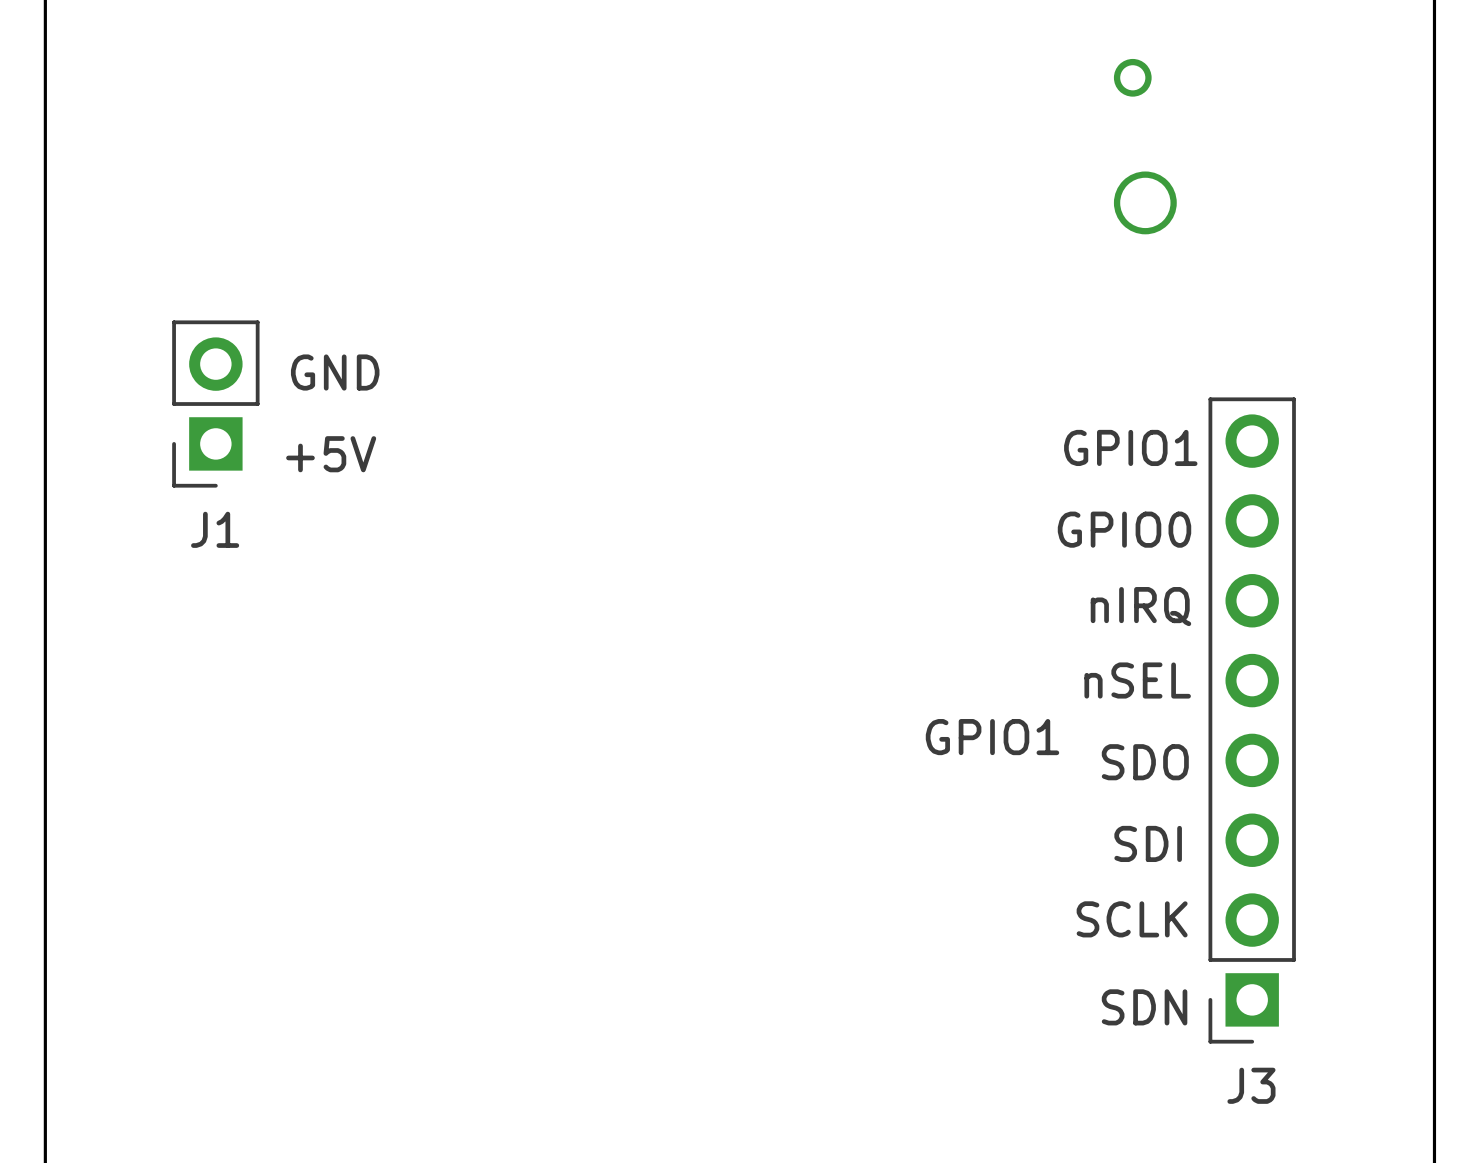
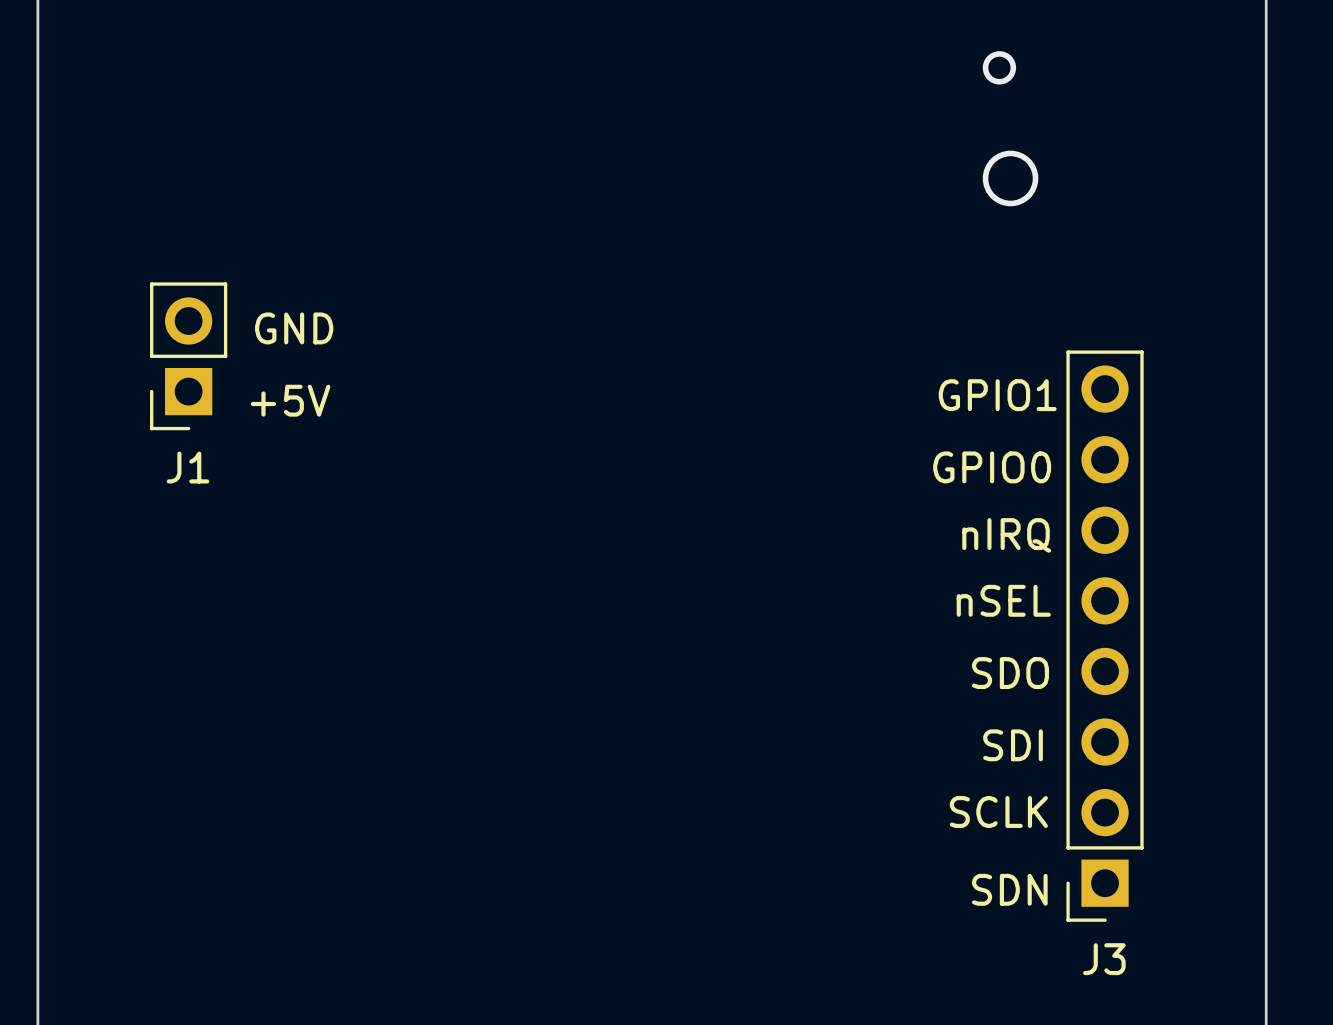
text: GPIO1 (992, 737) -> none

